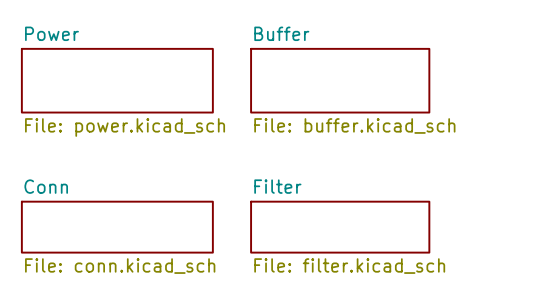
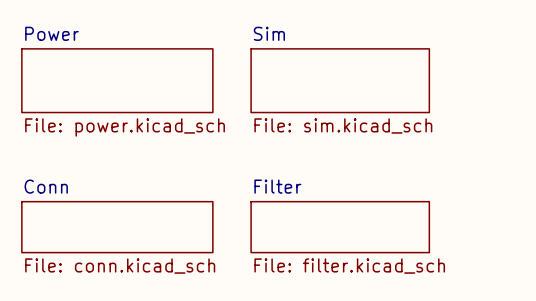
sheet Buffer name: Buffer (281, 33) -> Sim (269, 33)
sheet Buffer value: File: buffer.kicad_sch (354, 125) -> File: sim.kicad_sch (343, 125)

